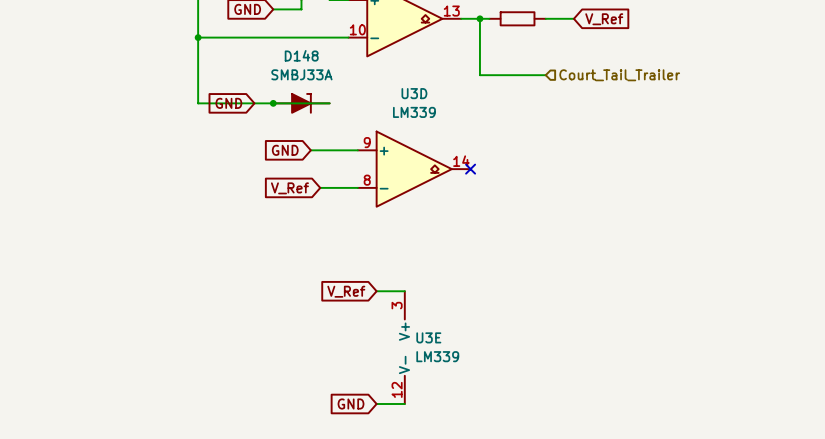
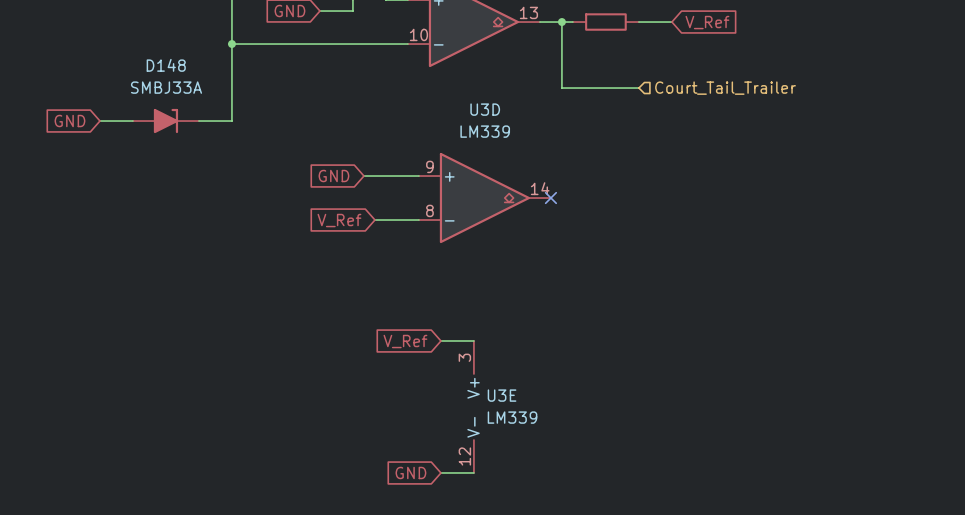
wire: none -> (99, 121) (132, 121)
wire: (198, 103) (329, 103) -> (231, 121) (198, 121)
global label position: GND (228, 103) -> GND (69, 121)
junction: (273, 103) -> none
D148 position: (301, 103) -> (165, 121)

